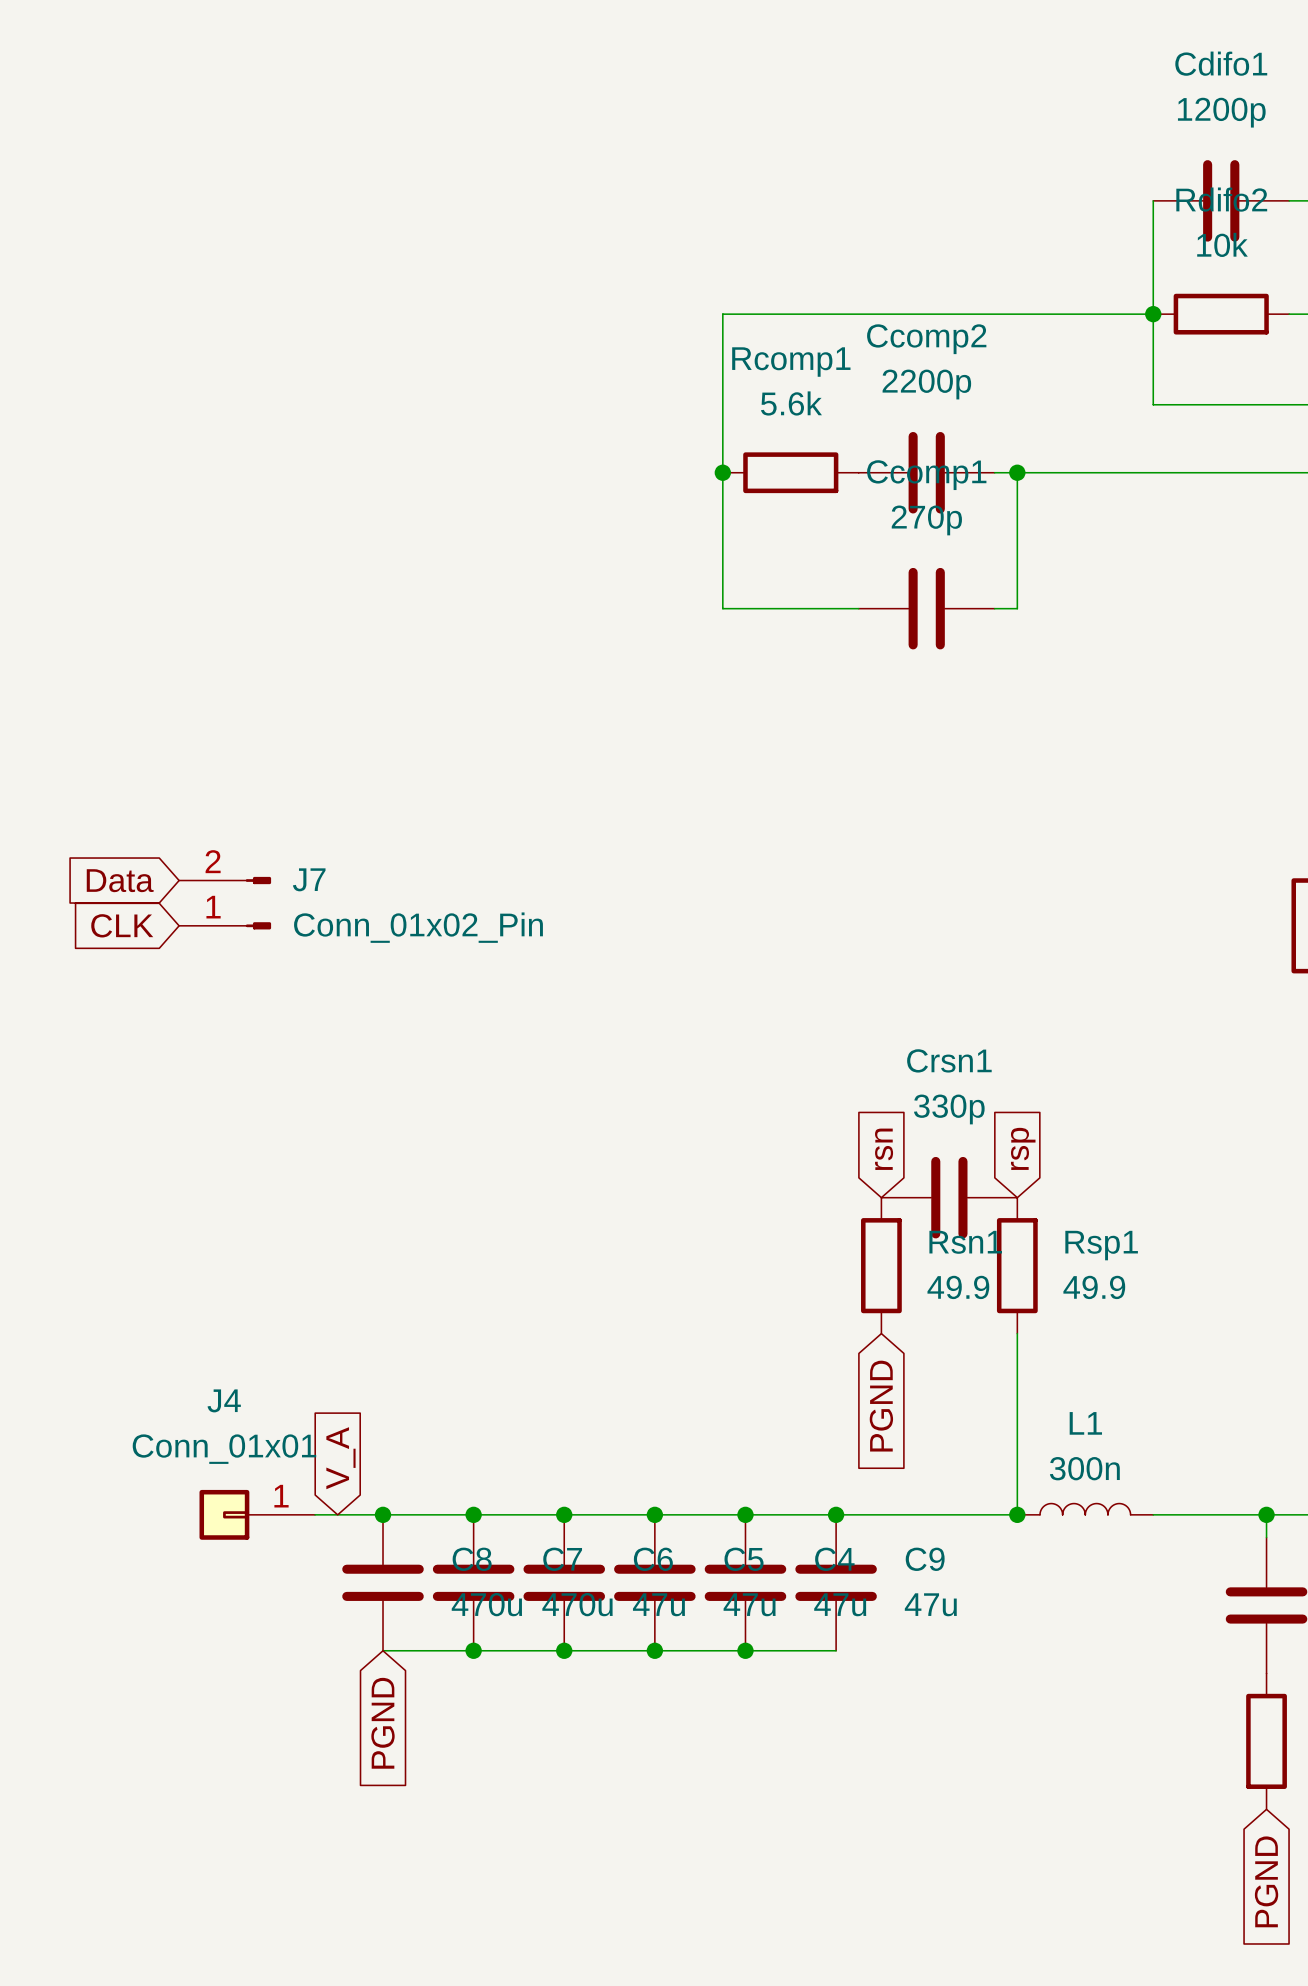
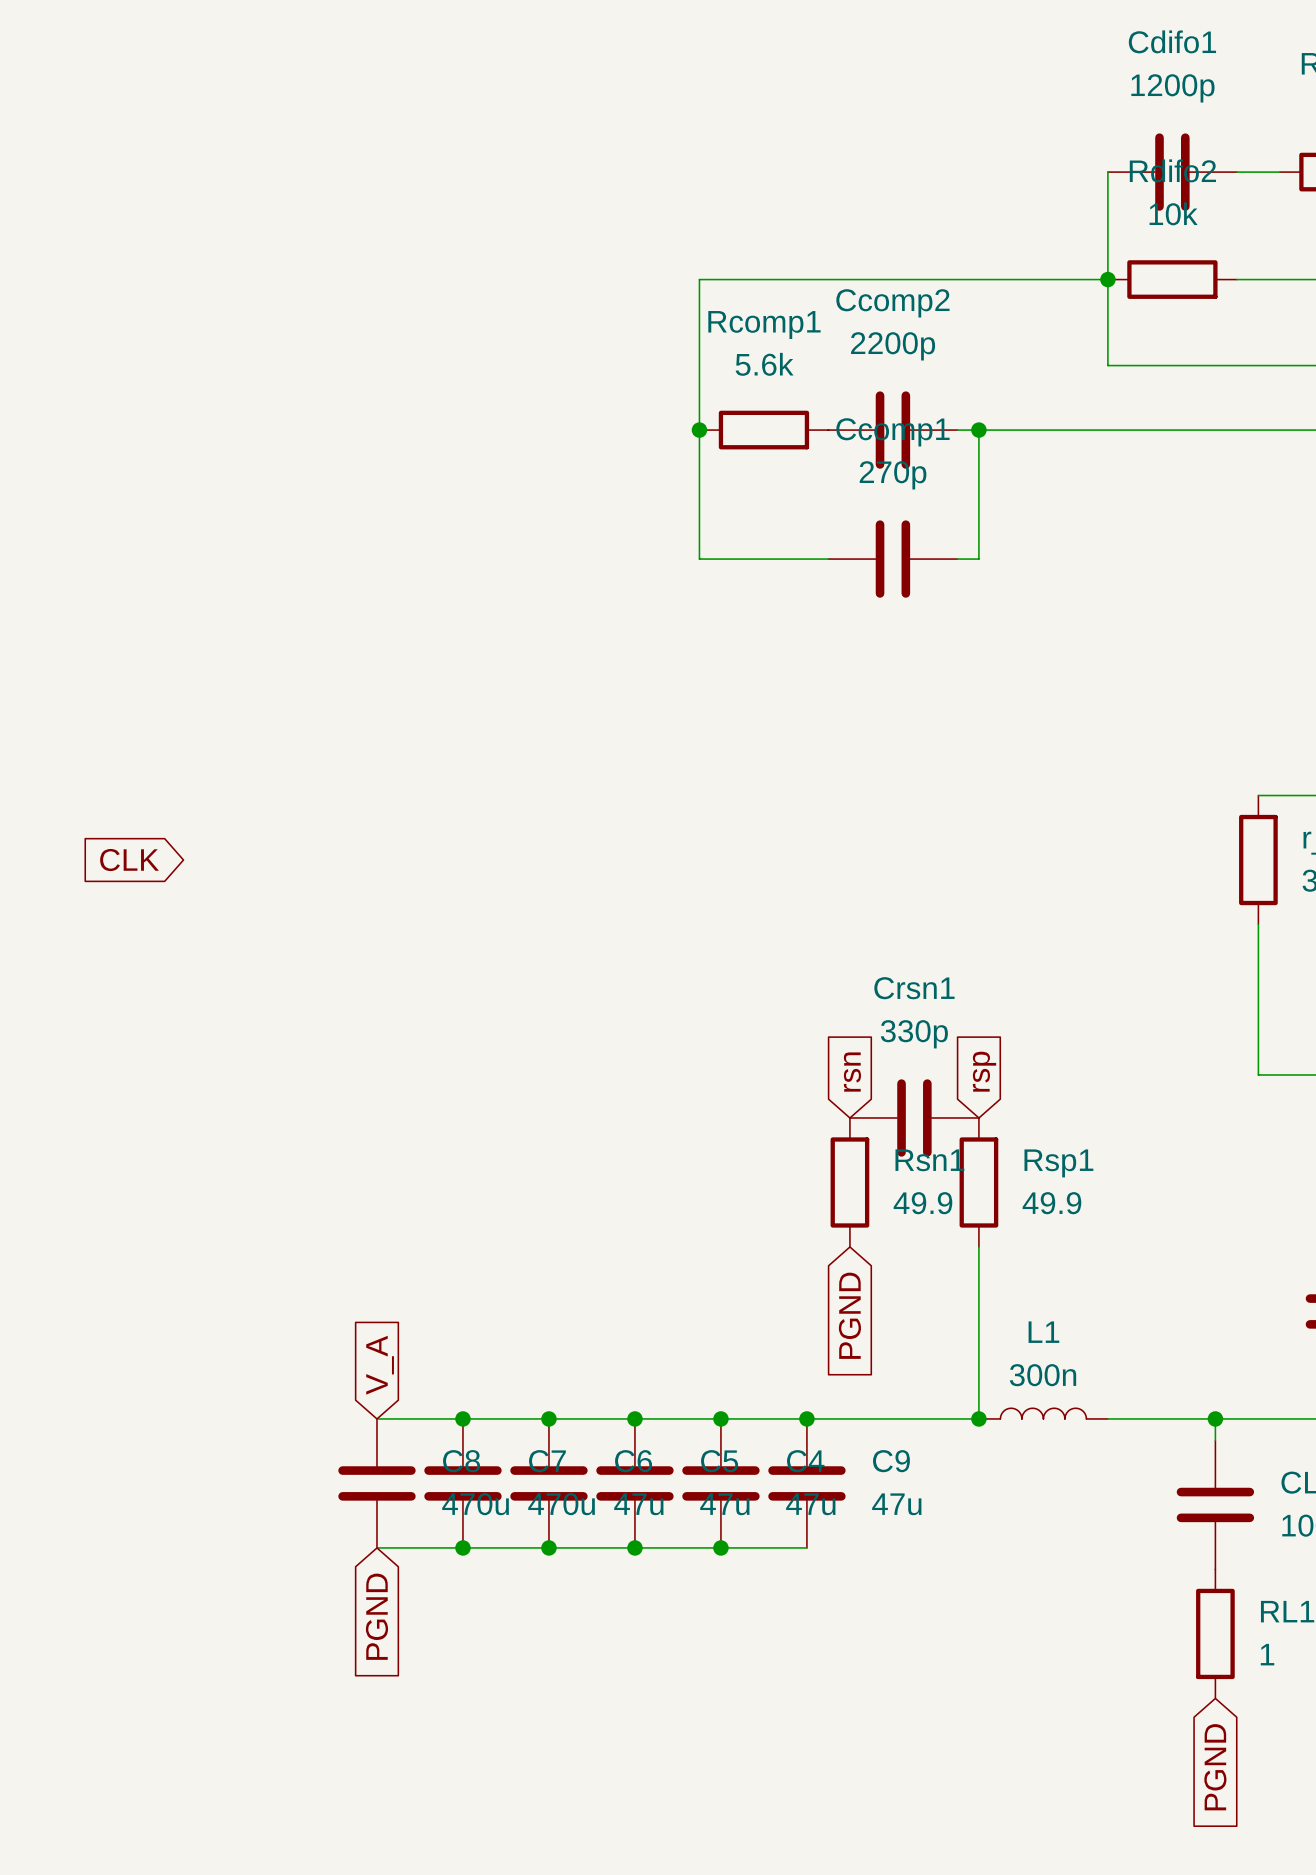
global label: Data (120, 880) -> none
J7: Conn_01x02_Pin (225, 903) -> none
global label position: V_A (340, 1458) -> V_A (380, 1365)
J4: Conn_01x01 (257, 1514) -> none
wire: (315, 1514) (383, 1514) -> none
junction: (383, 1514) -> none

